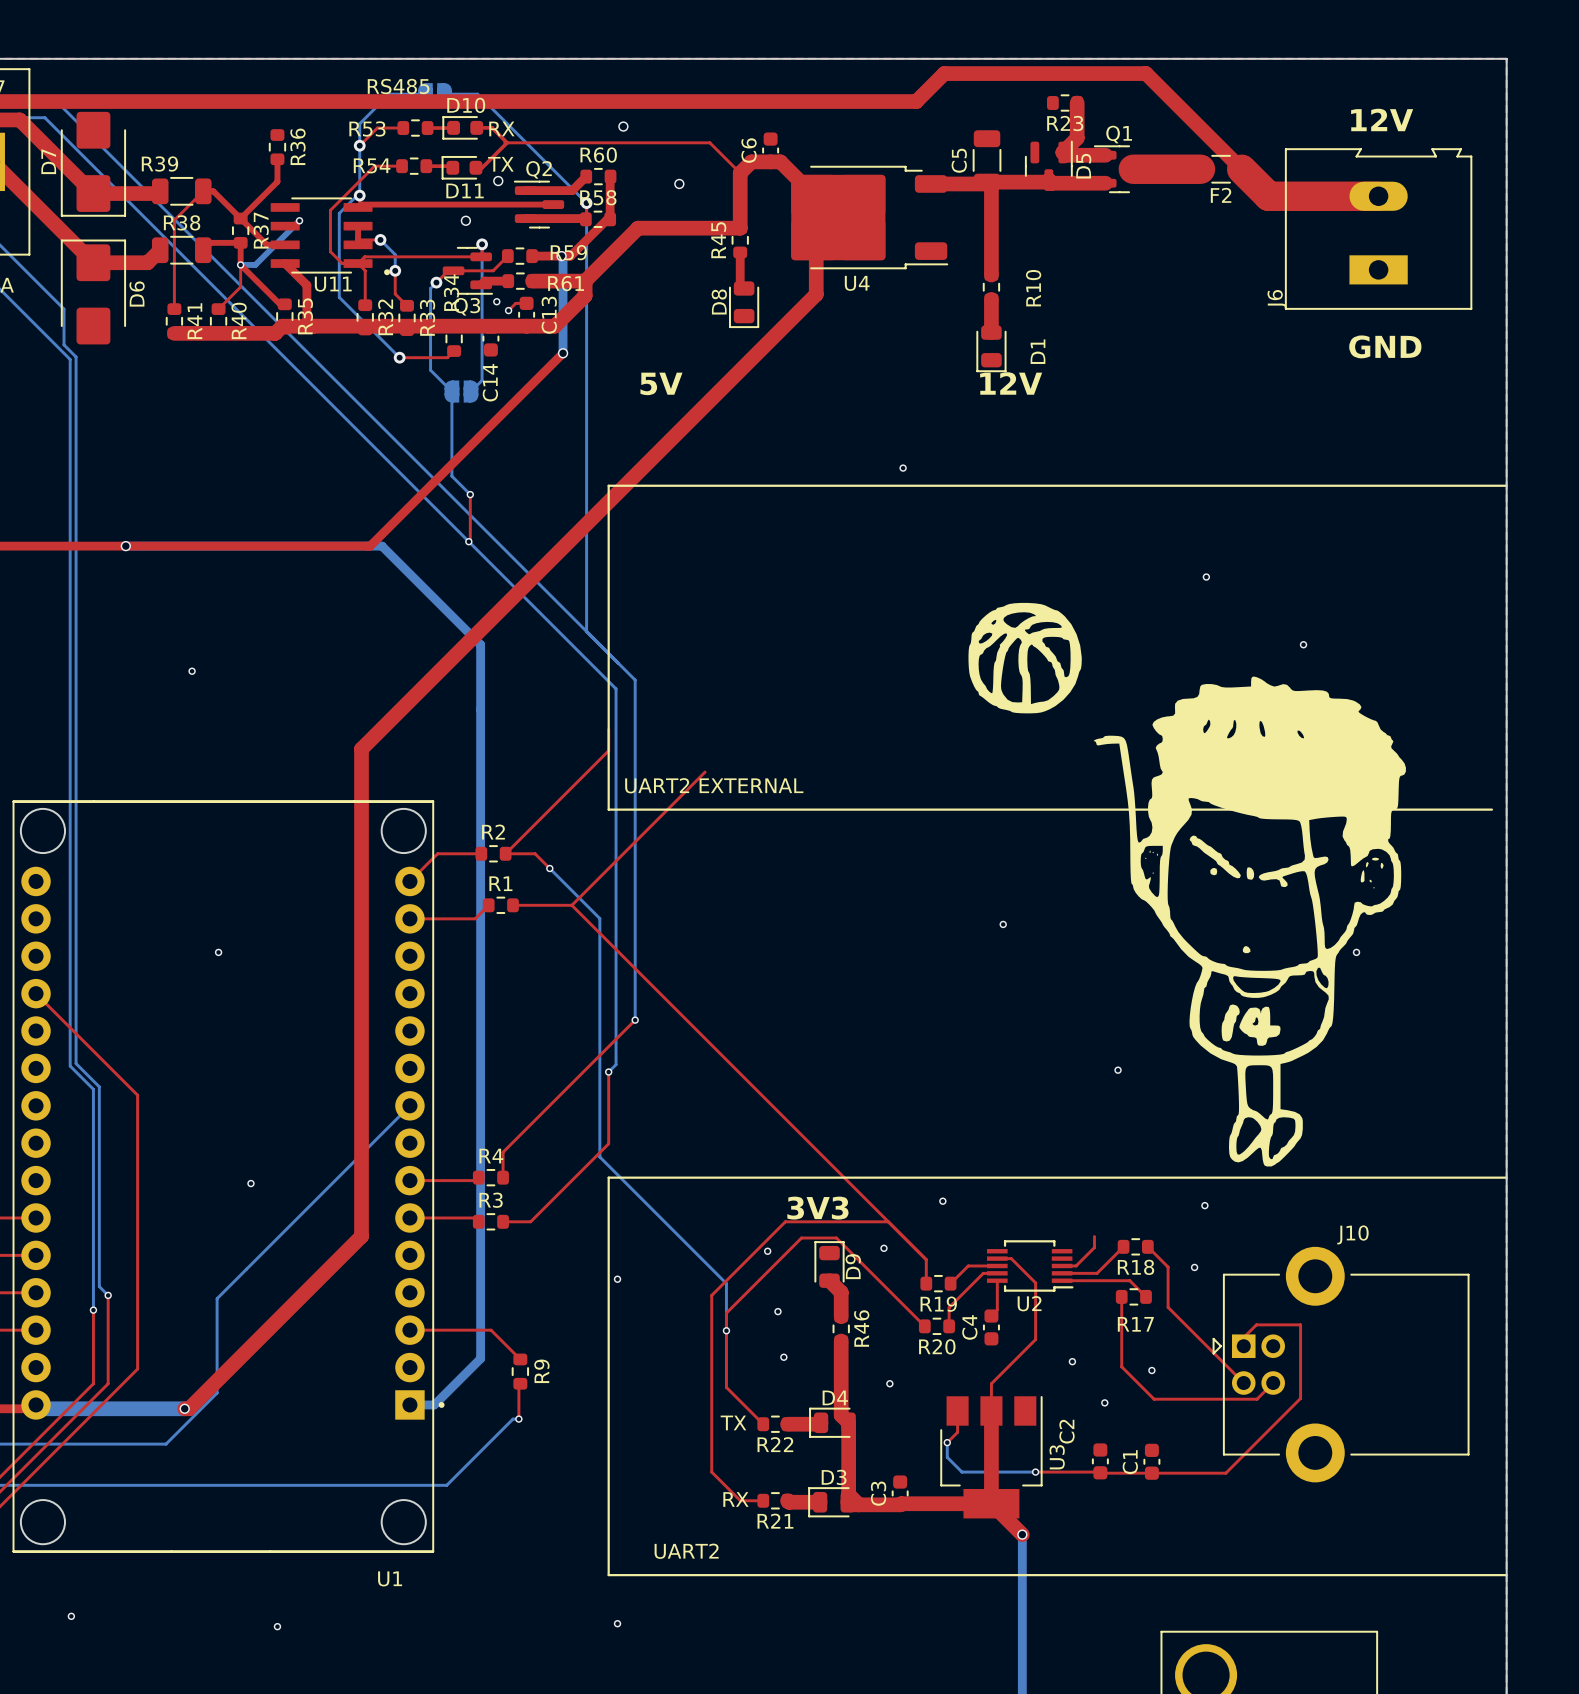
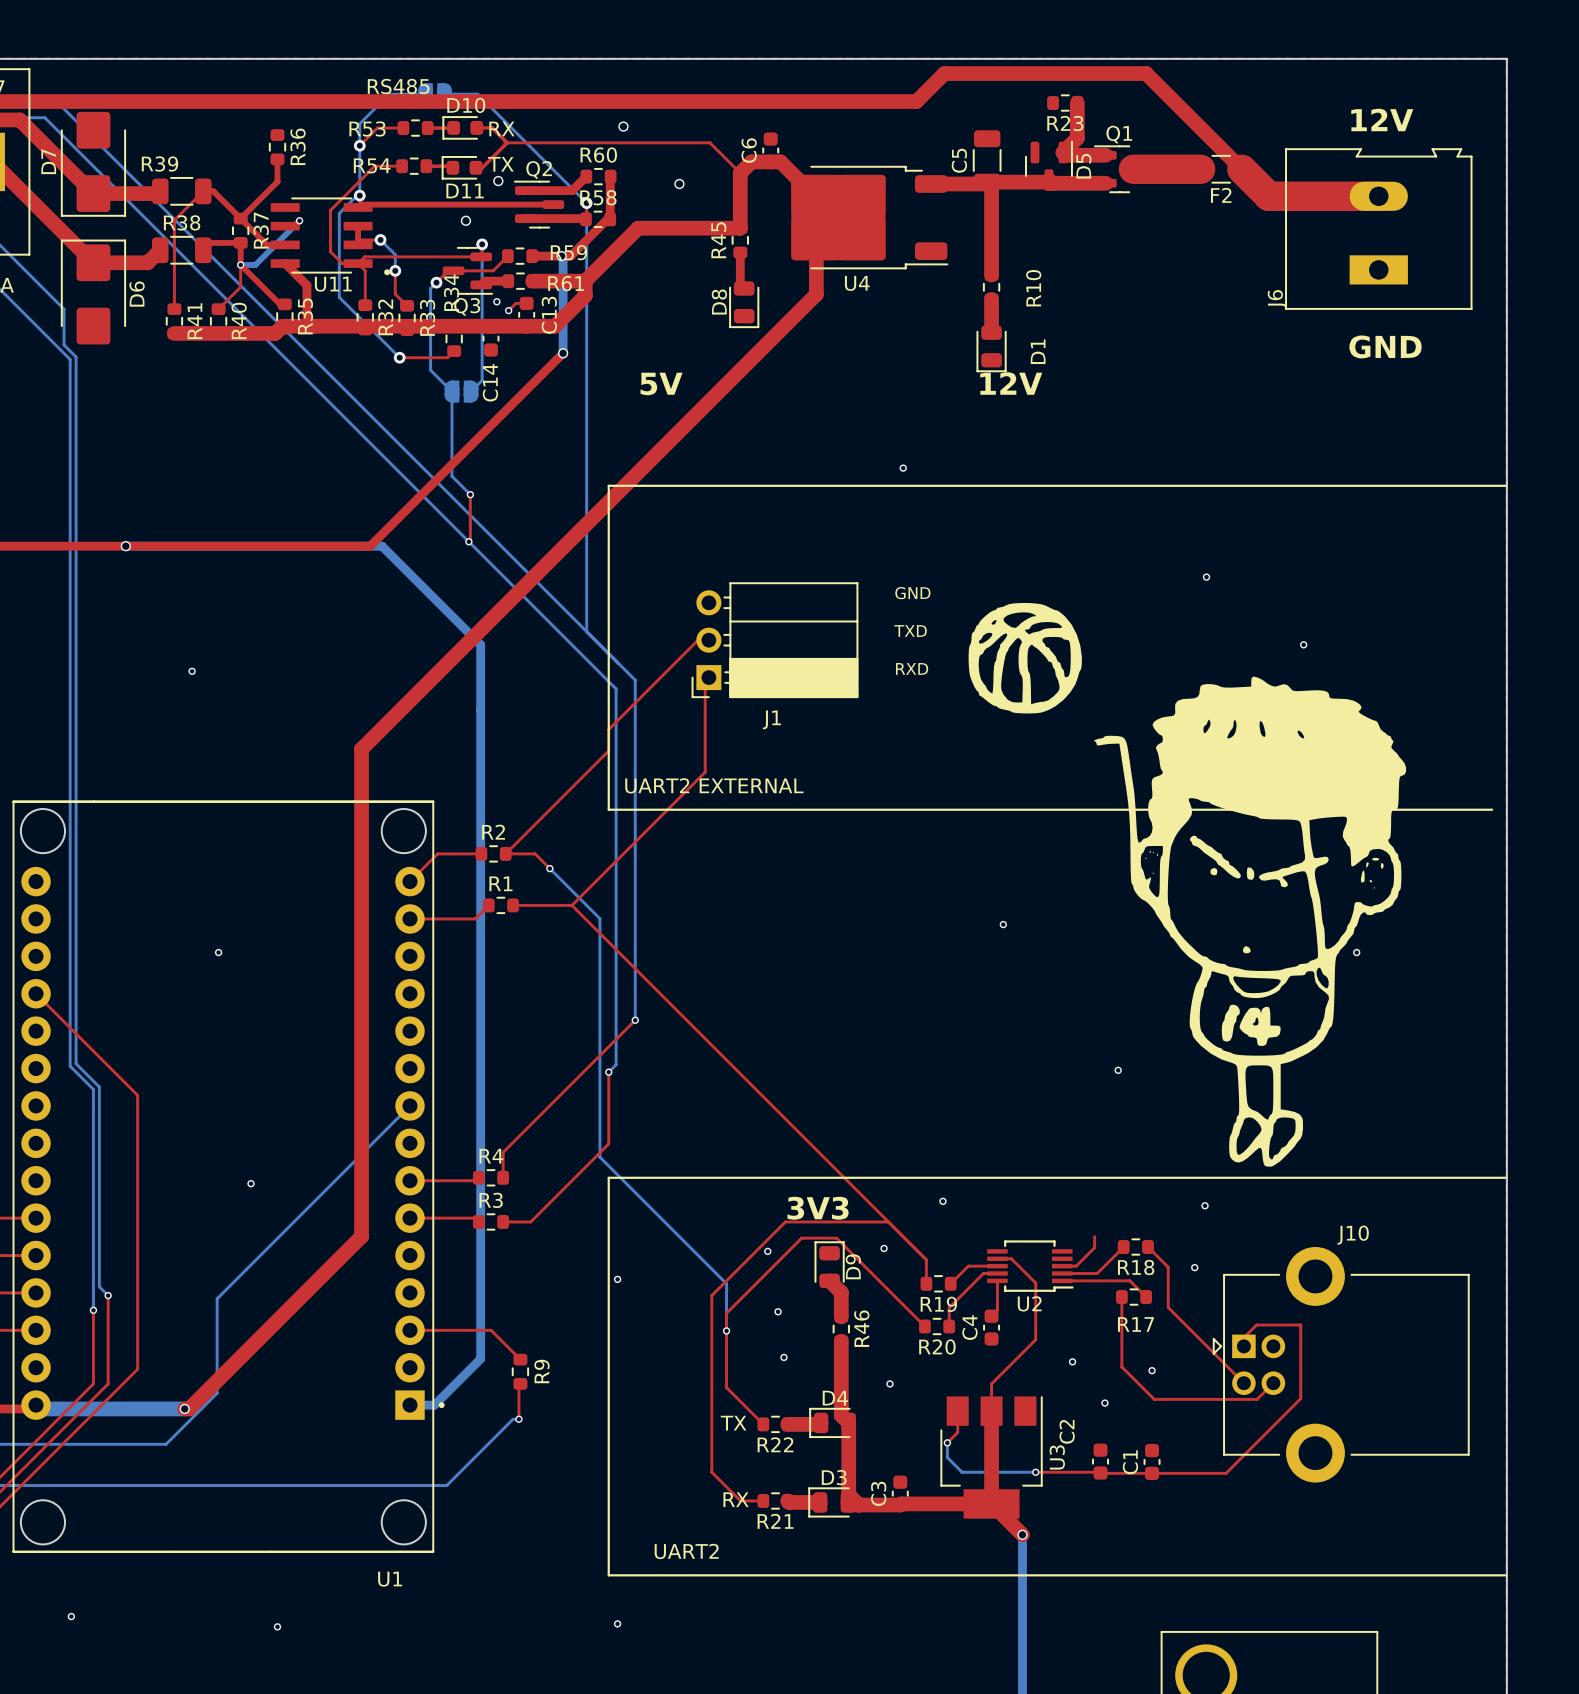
text: none -> GND (912, 593)
text: none -> TXD (910, 631)
top track: none -> (705, 633) (608, 729)
J1: none -> (774, 640)
text: none -> RXD (912, 668)
top track: none -> (705, 669) (705, 772)

